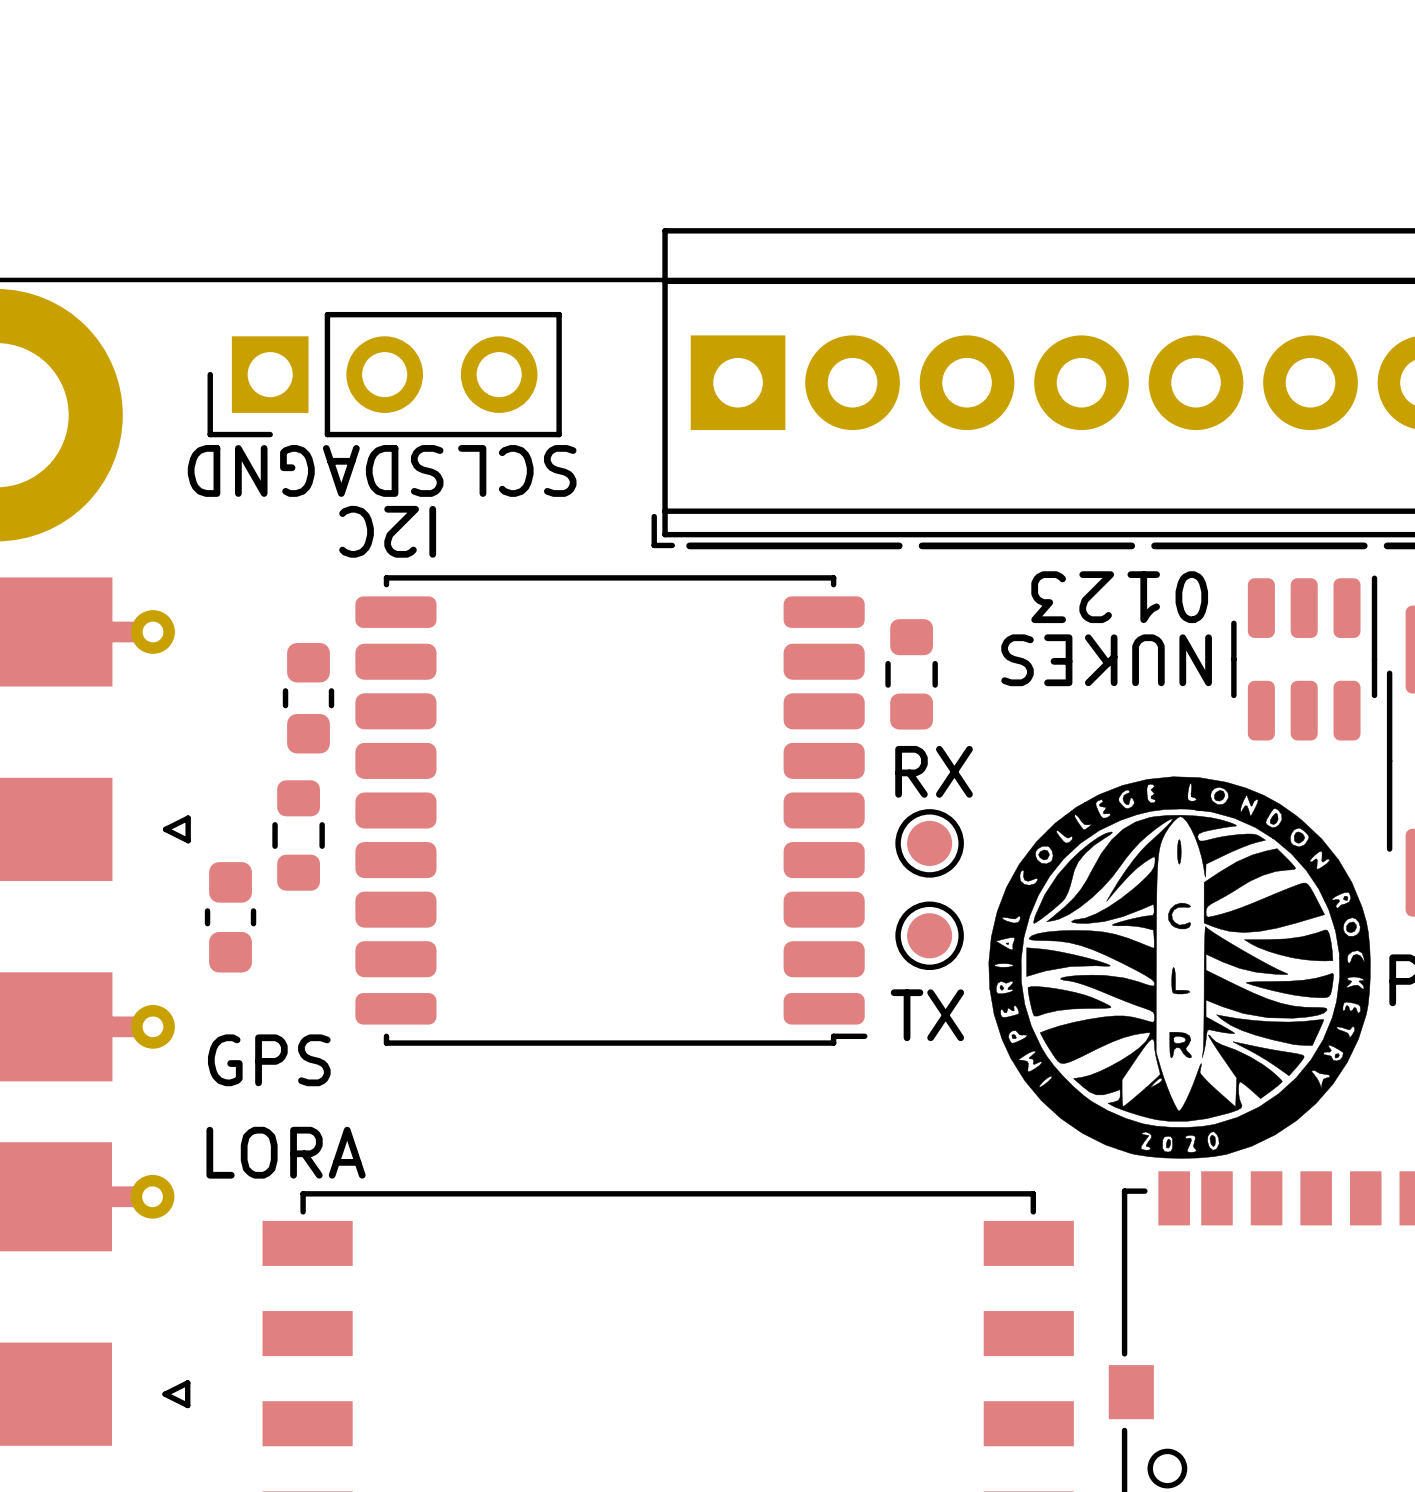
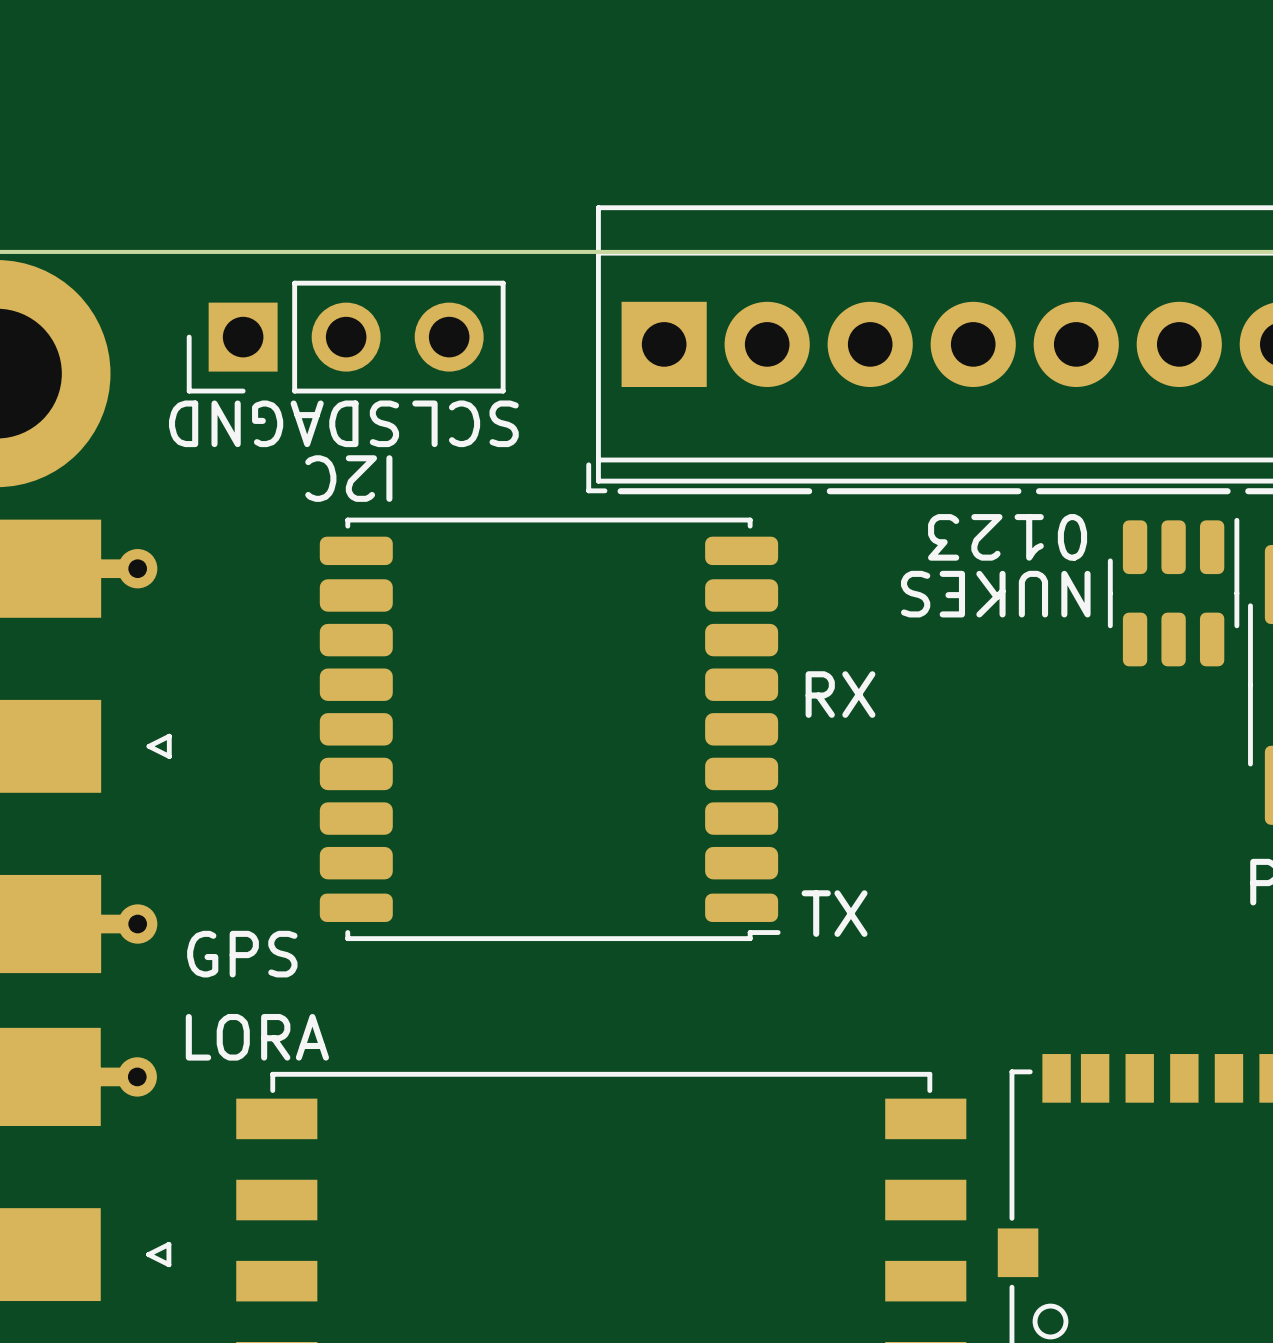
part: (911, 674) -> none
part: (308, 698) -> none
drawing: [988, 776, 1371, 1159] -> none
part: (298, 835) -> none
part: (929, 843) -> none
part: (230, 917) -> none
part: (929, 935) -> none

